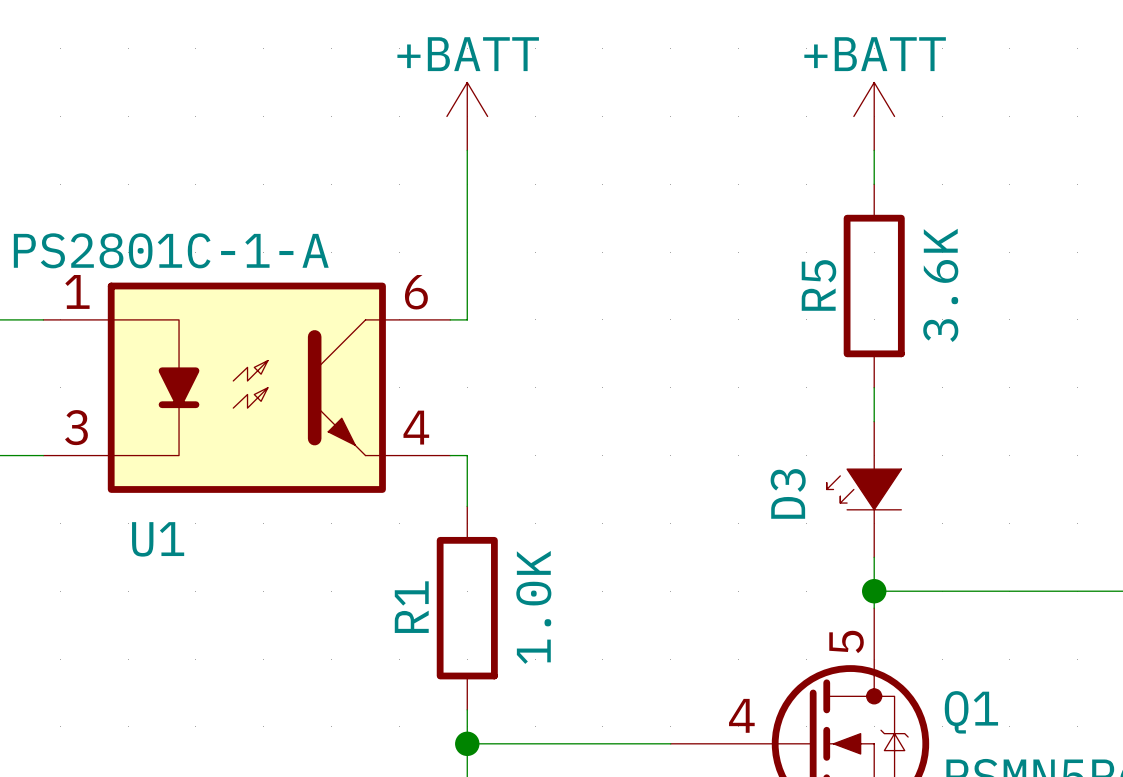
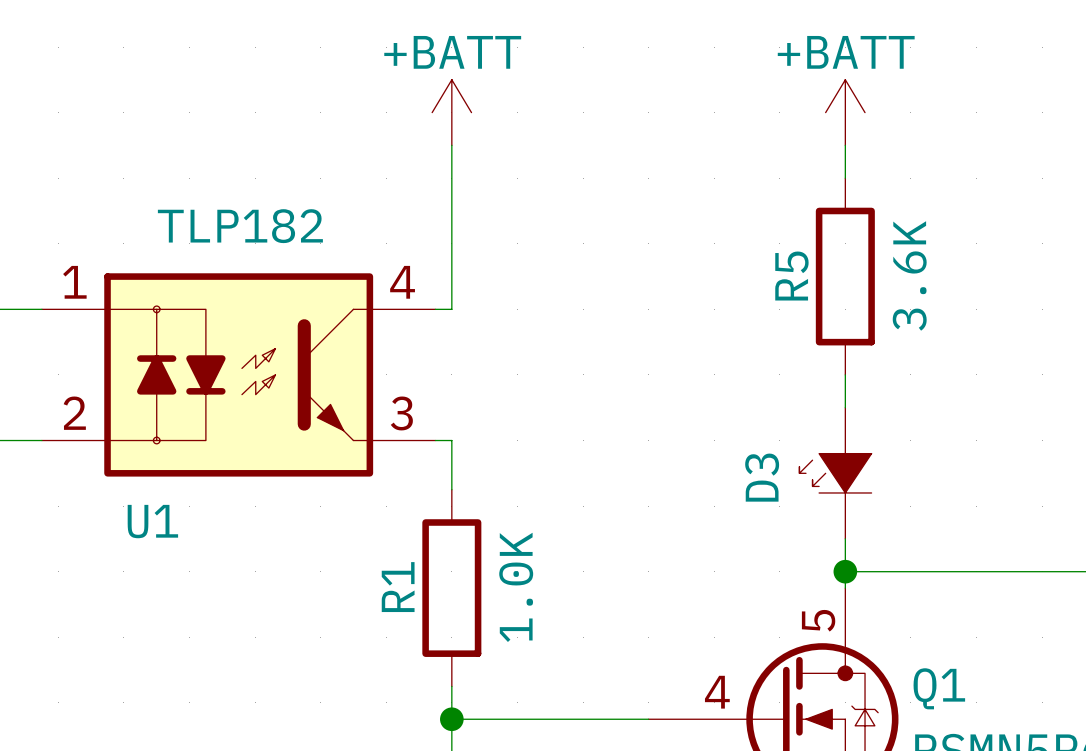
U1 value: PS2801C-1-A (171, 250) -> TLP182 (240, 226)
U1 symbol: [43, 282, 451, 493] -> [41, 273, 436, 477]

